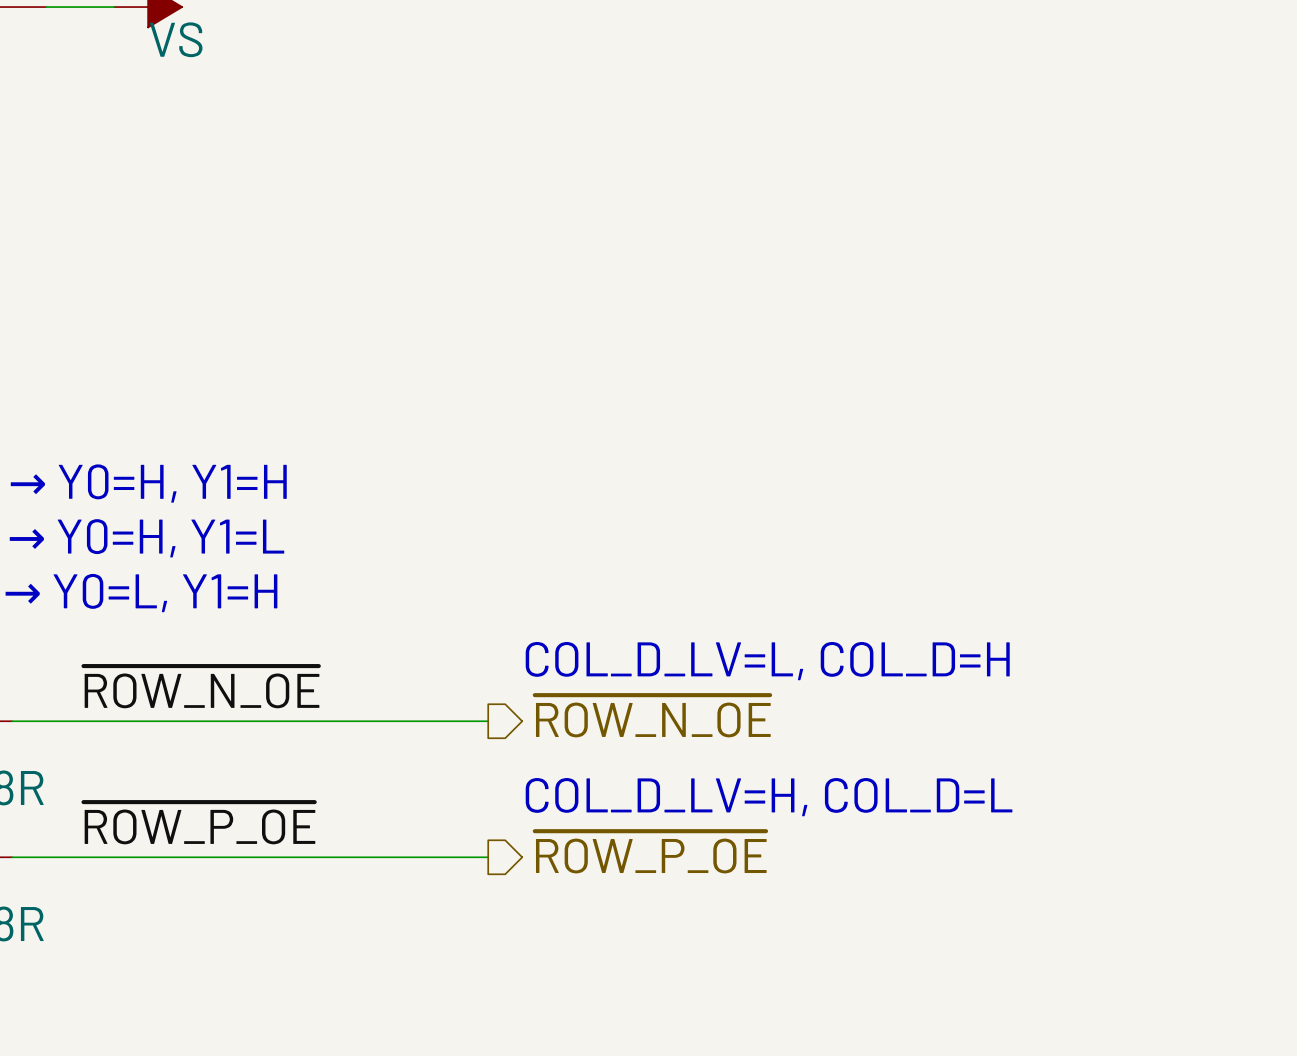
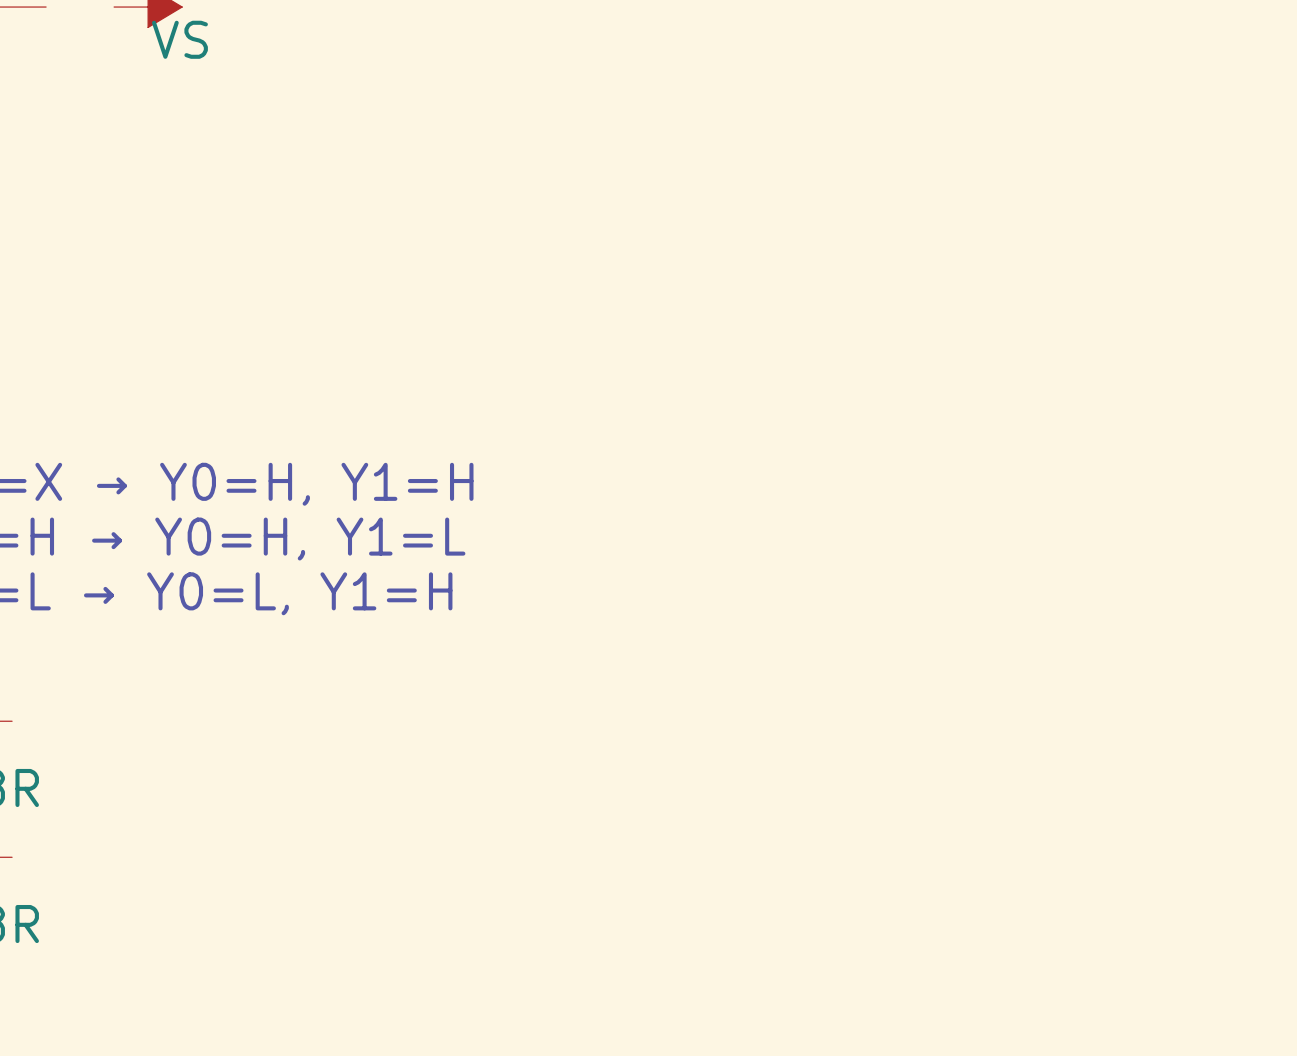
wire: (46, 7) (114, 7) -> none
text: COL_D_LV=L, COL_D=H (767, 661) -> none
label: ~{ROW_N_OE} (201, 687) -> none
hierarchical label: ~{ROW_N_OE} (652, 716) -> none
wire: (12, 721) (488, 721) -> none
text: COL_D_LV=H, COL_D=L (769, 797) -> none
label: ~{ROW_P_OE} (199, 823) -> none
hierarchical label: ~{ROW_P_OE} (650, 852) -> none
wire: (12, 857) (488, 857) -> none

